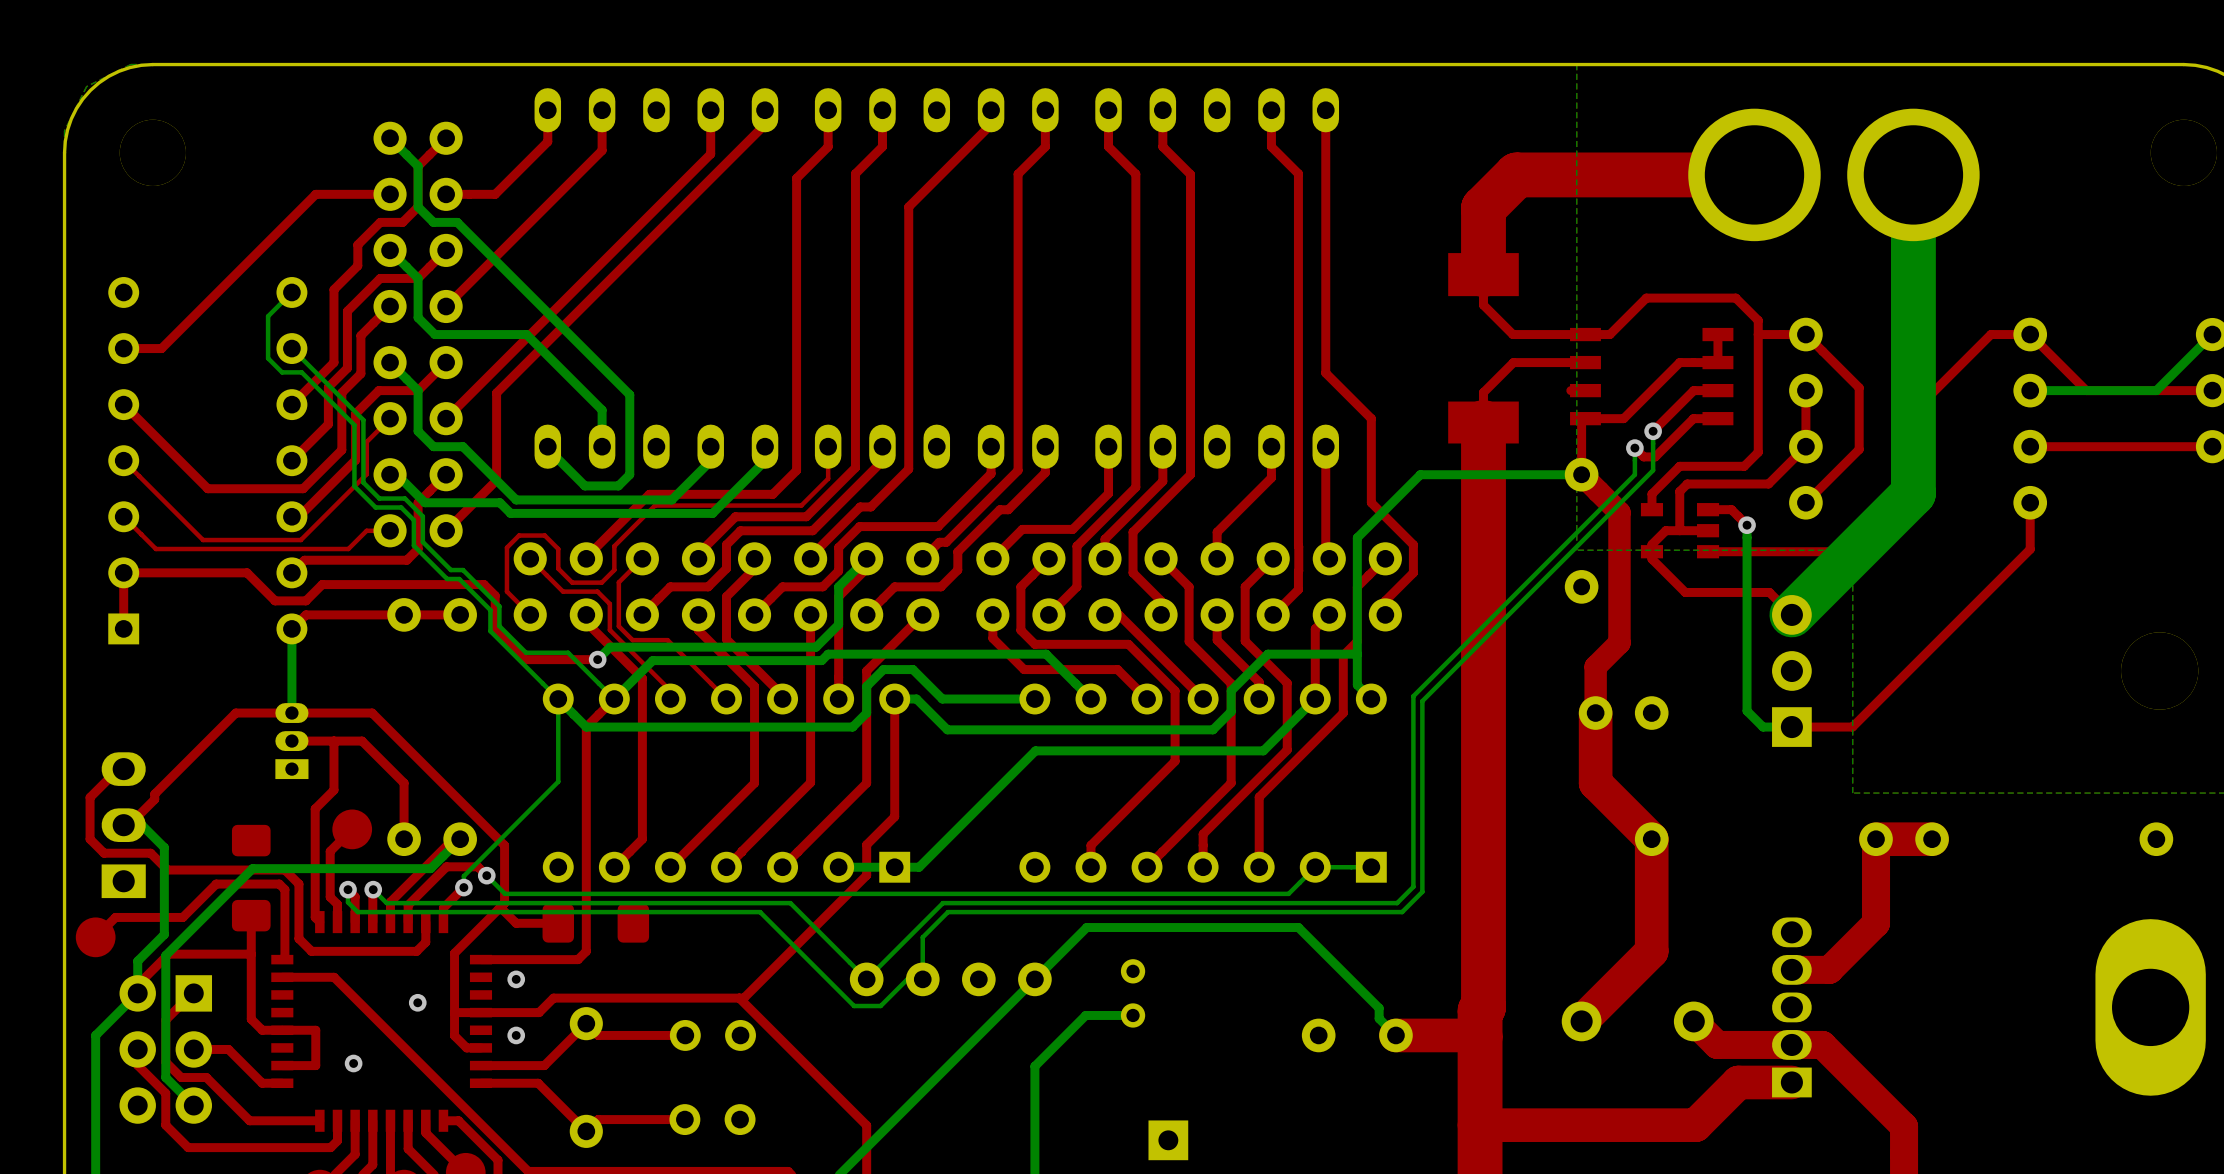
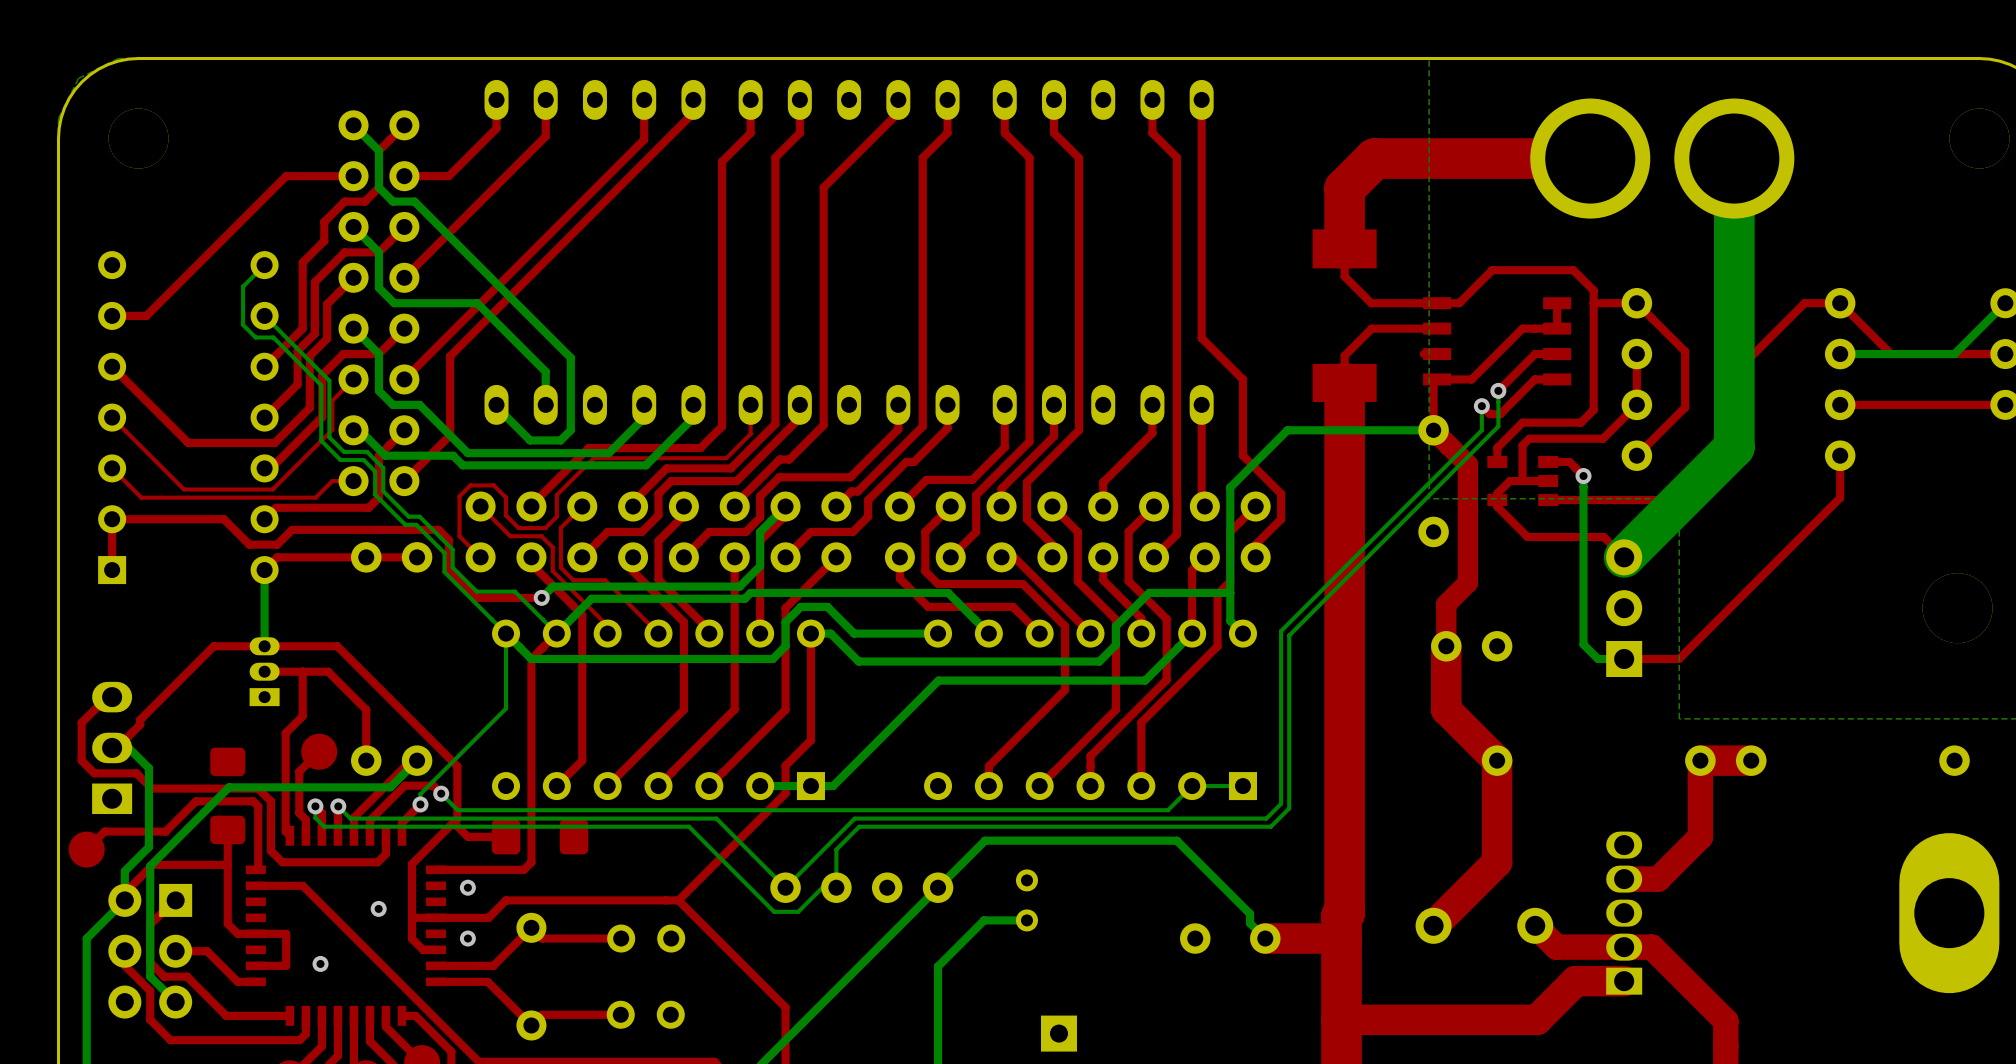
top track: (748, 993) (743, 998) (553, 998) -> (785, 1020) (785, 1007) (678, 900) (506, 900) (501, 904)
top track: (739, 998) (866, 1125) -> none

